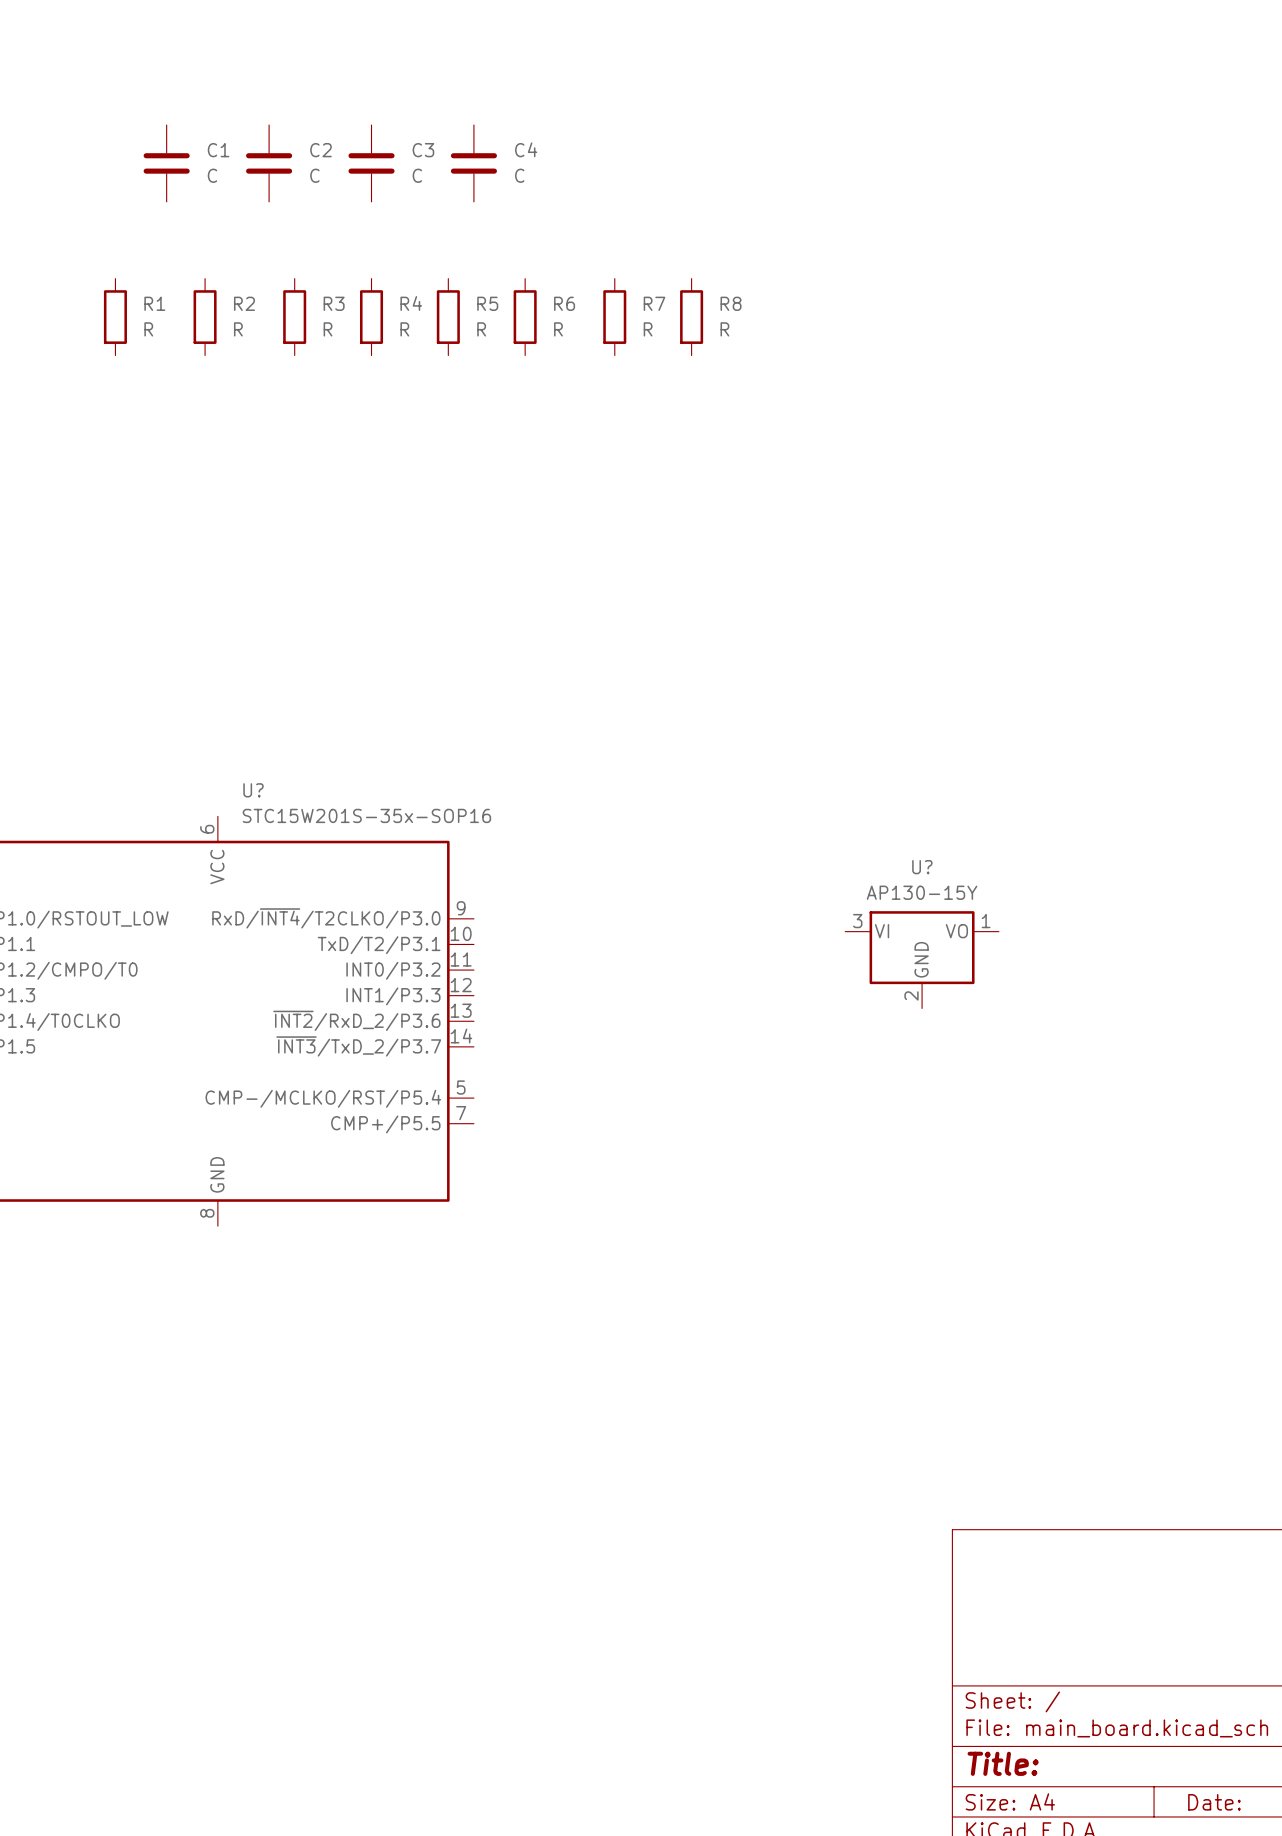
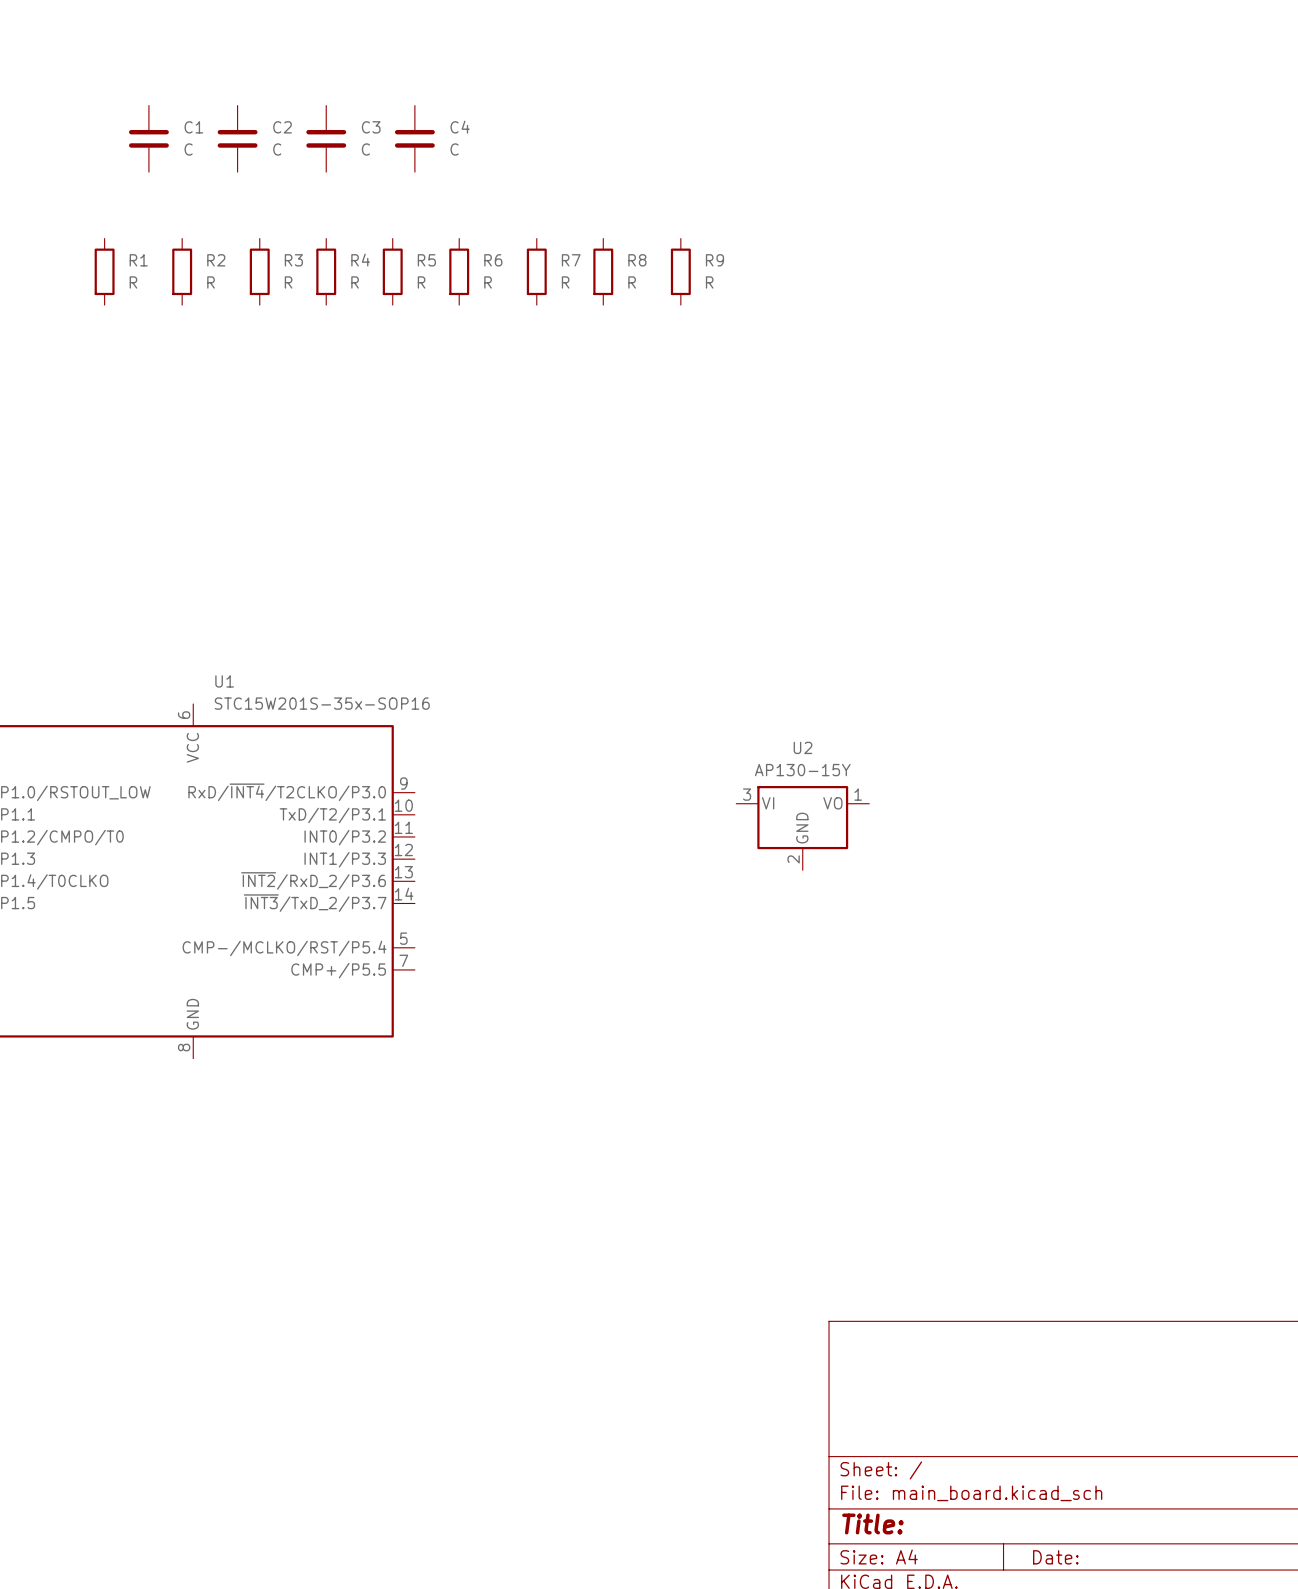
R9: none -> R (680, 271)
U? name: U? (253, 790) -> U1 (224, 681)
U? name: U? (922, 867) -> U2 (803, 747)

